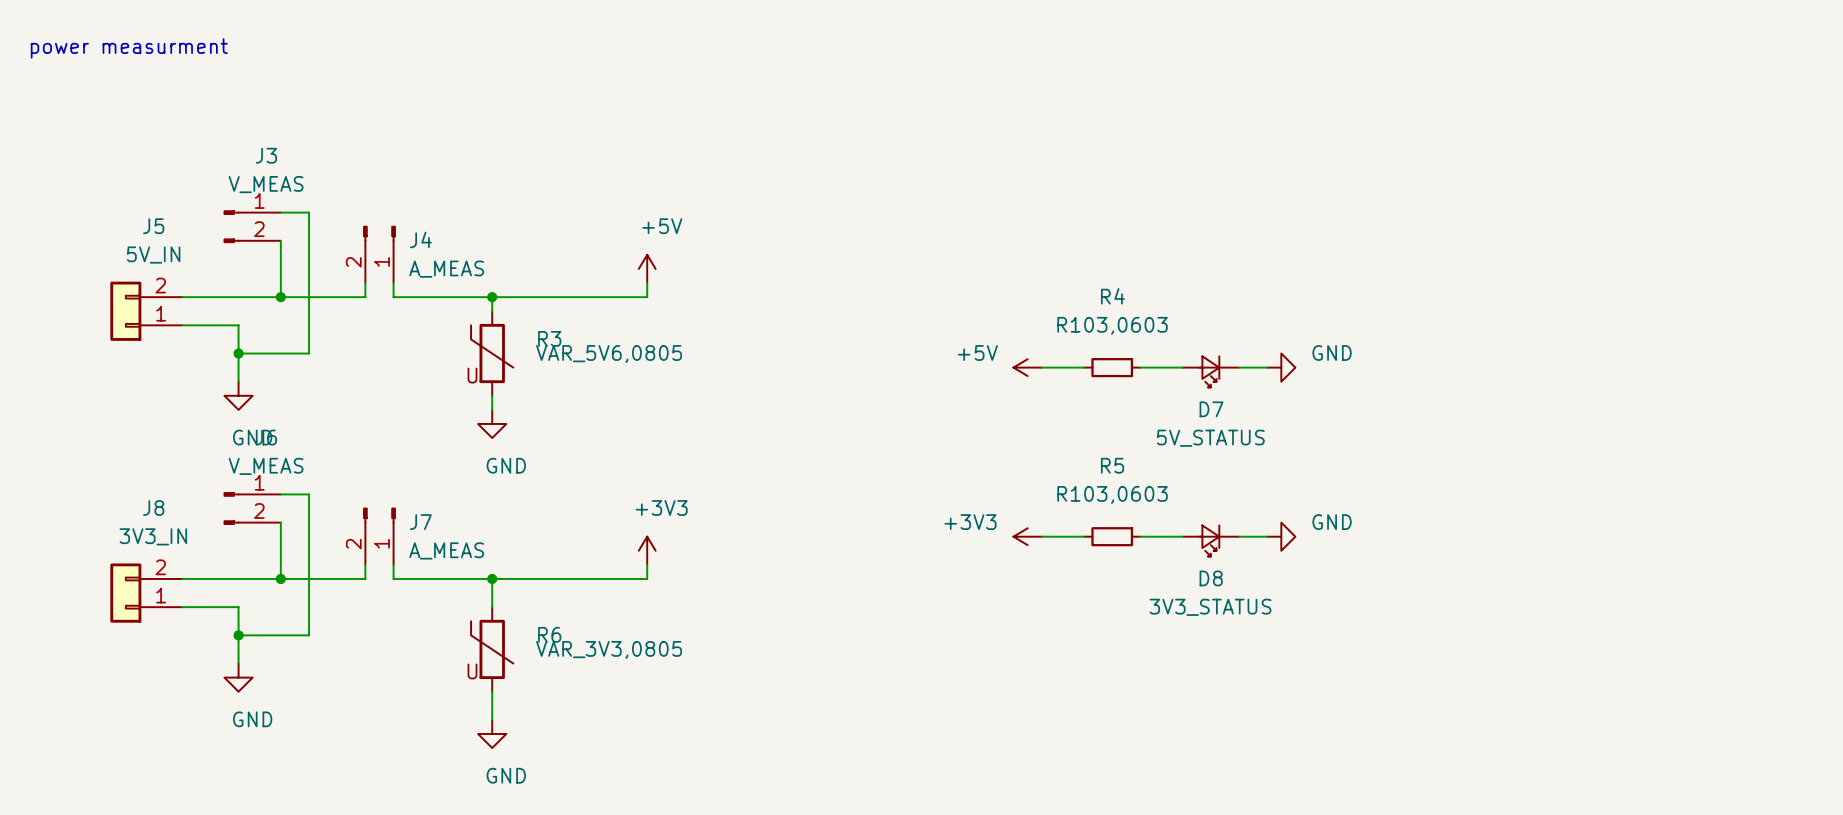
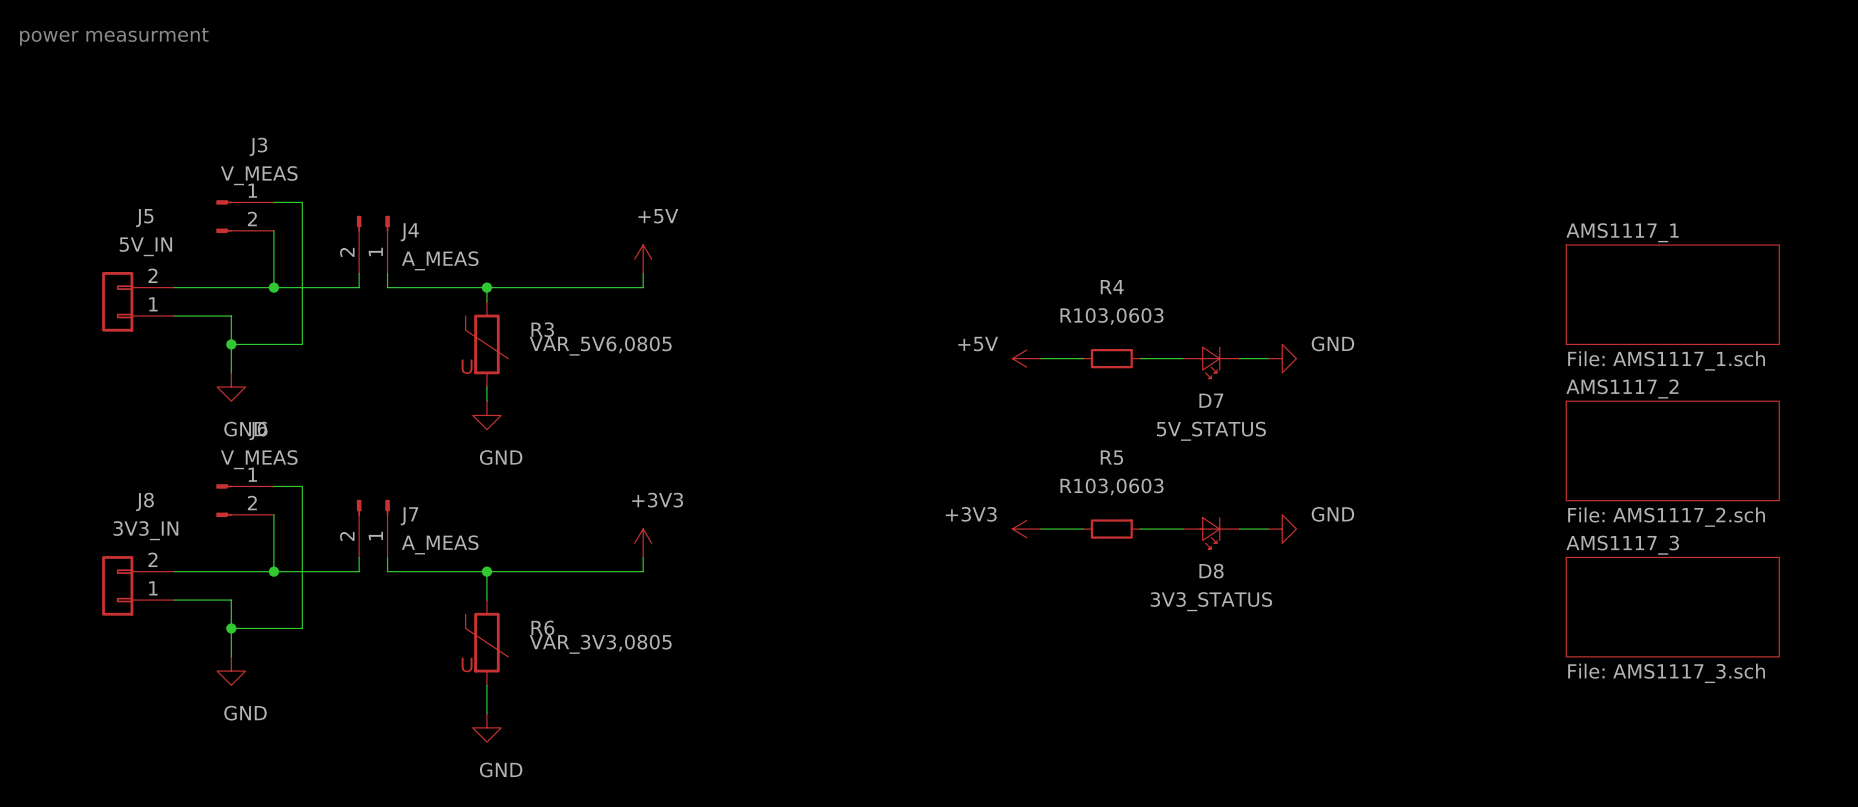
sheet AMS1117_1: none -> File: AMS1117_1.sch (1672, 294)
sheet AMS1117_2: none -> File: AMS1117_2.sch (1672, 450)
sheet AMS1117_3: none -> File: AMS1117_3.sch (1672, 607)

